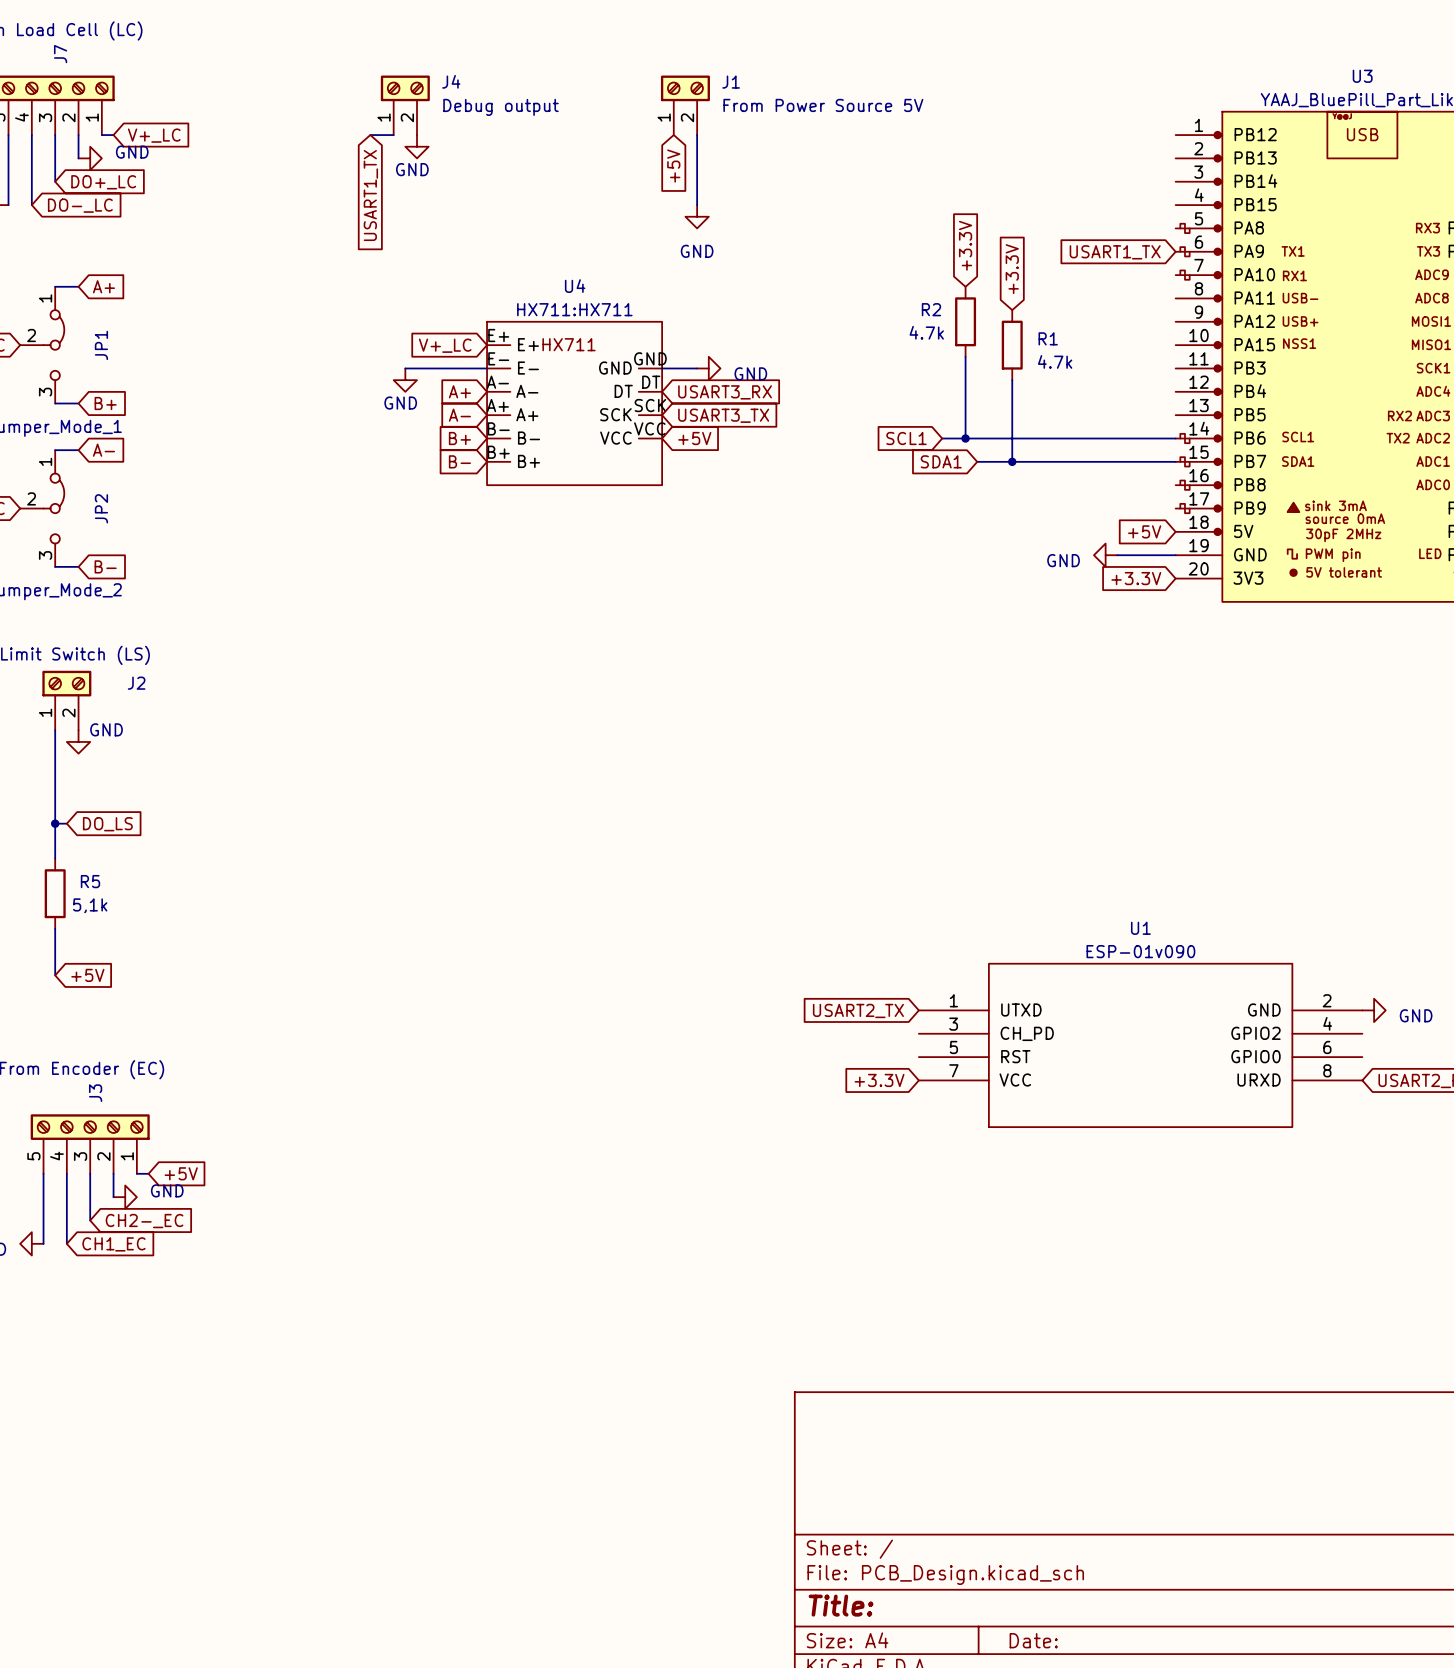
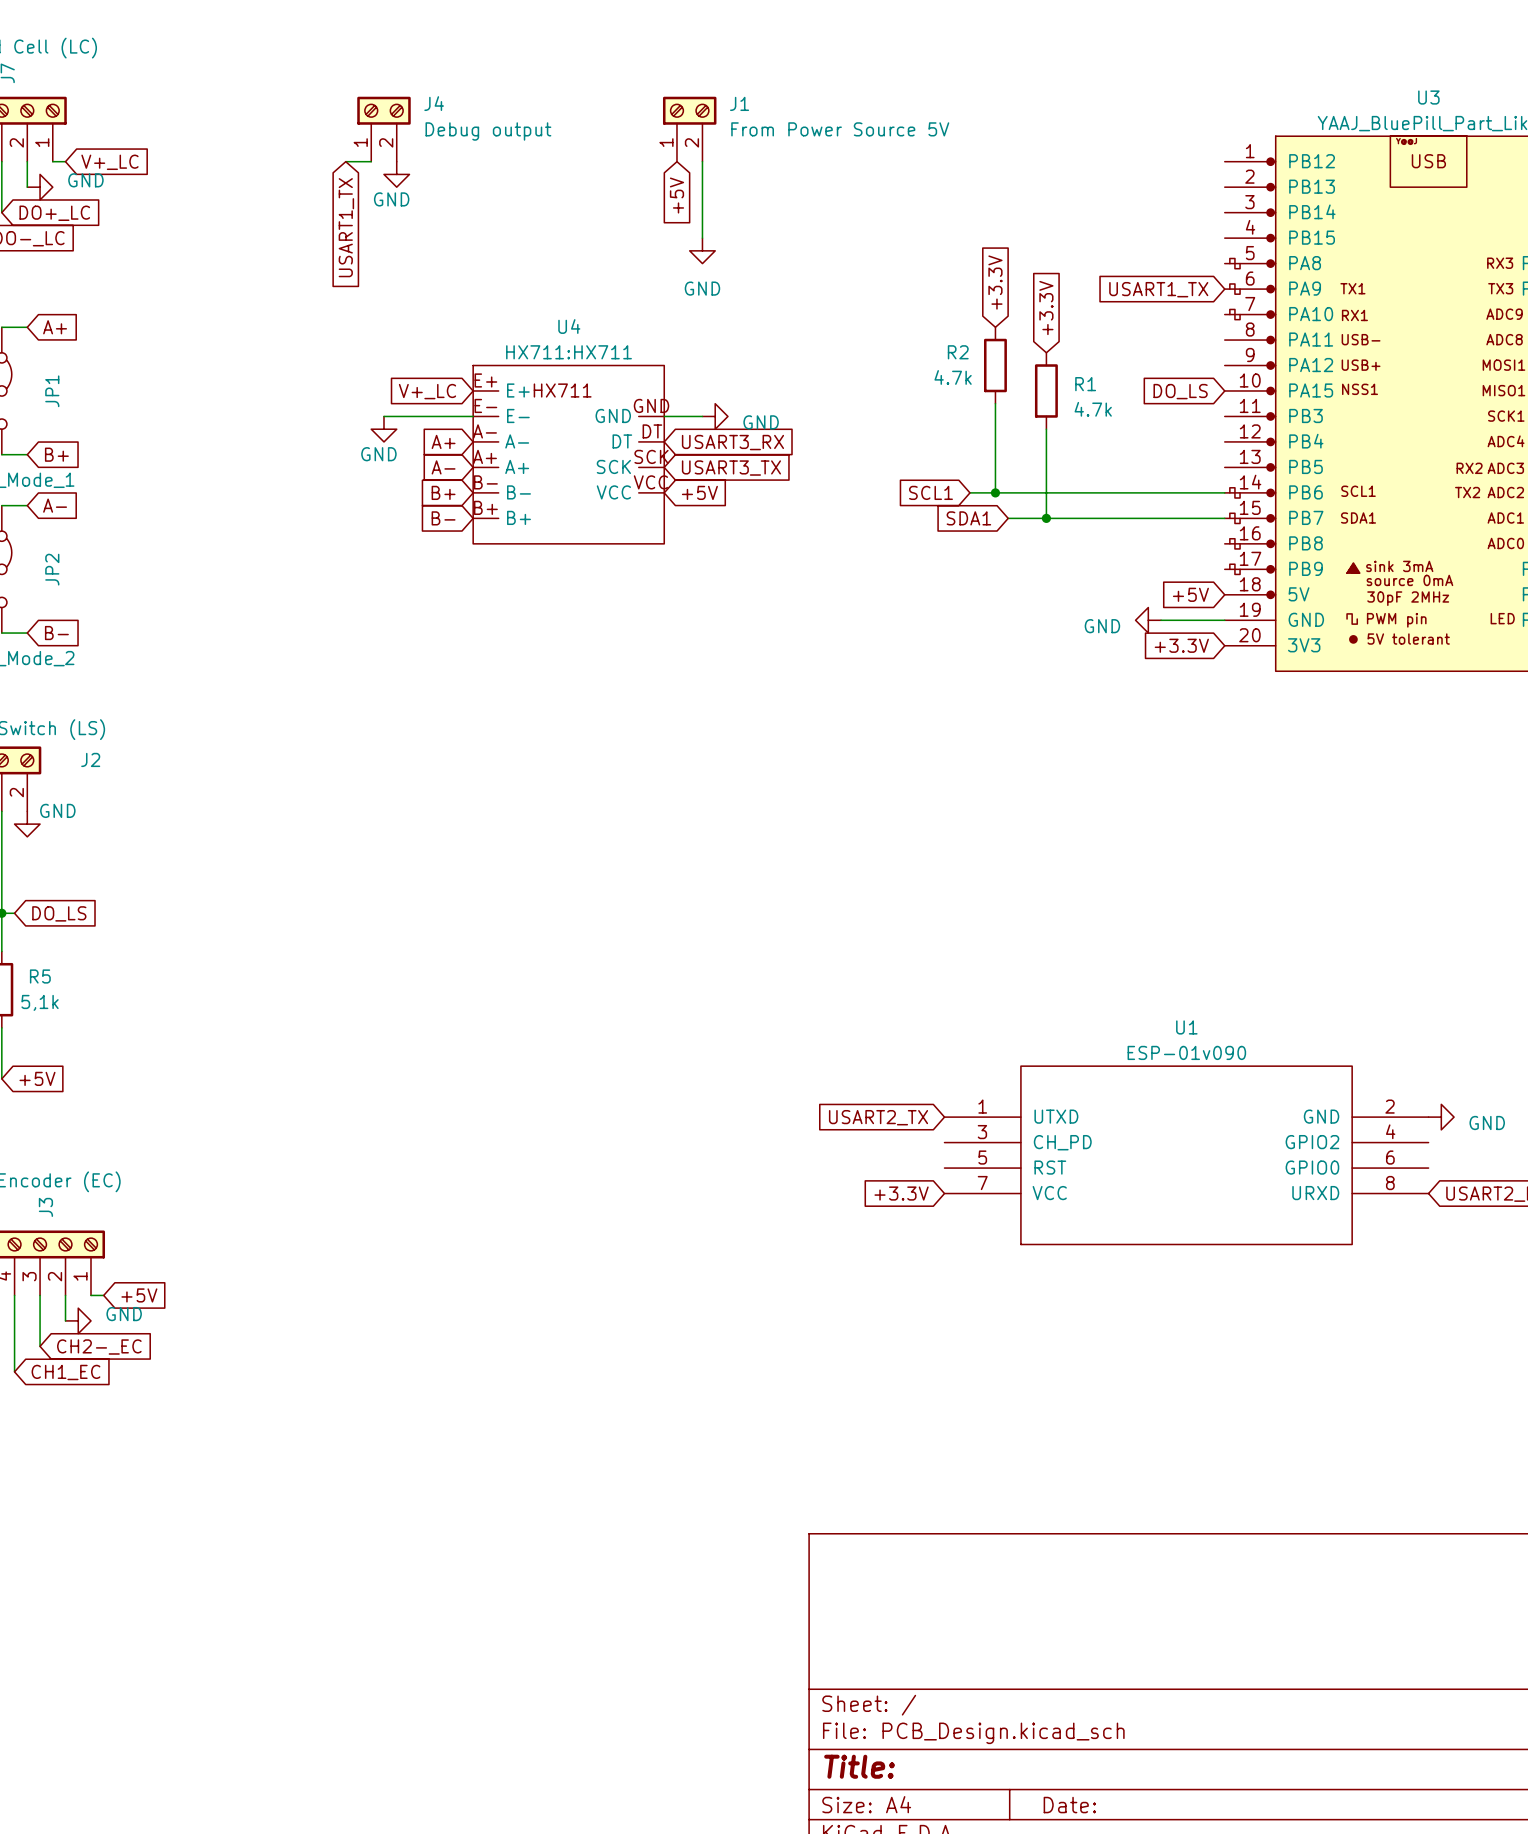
global label: none -> DO_LS (1180, 391)

